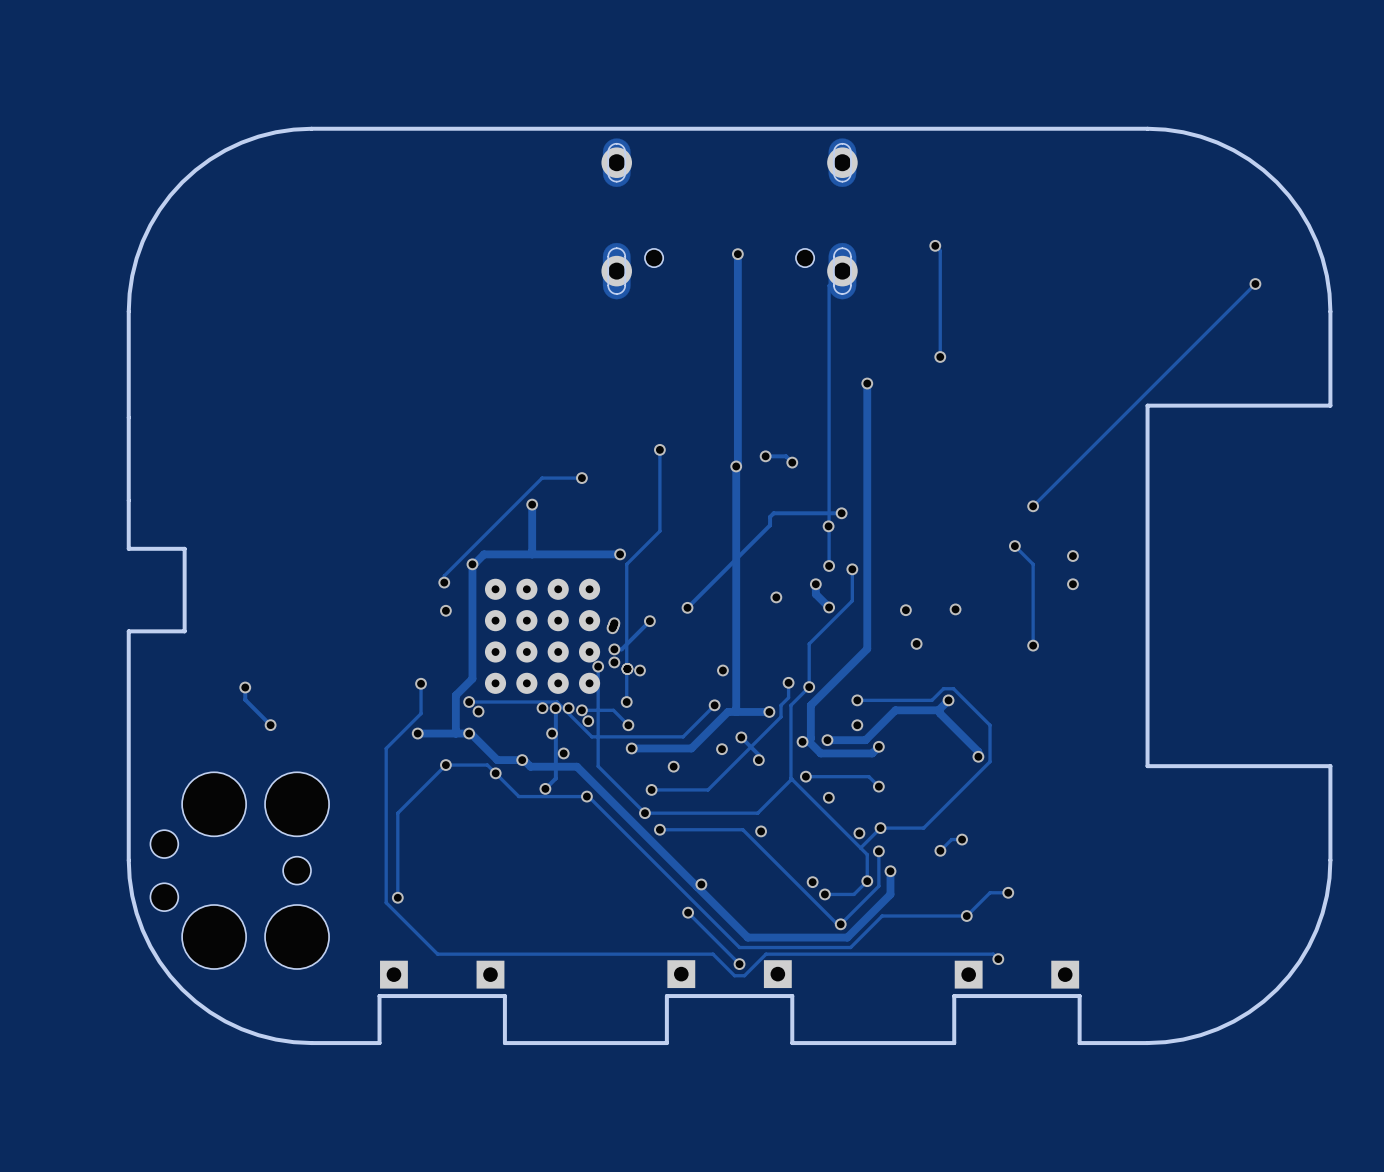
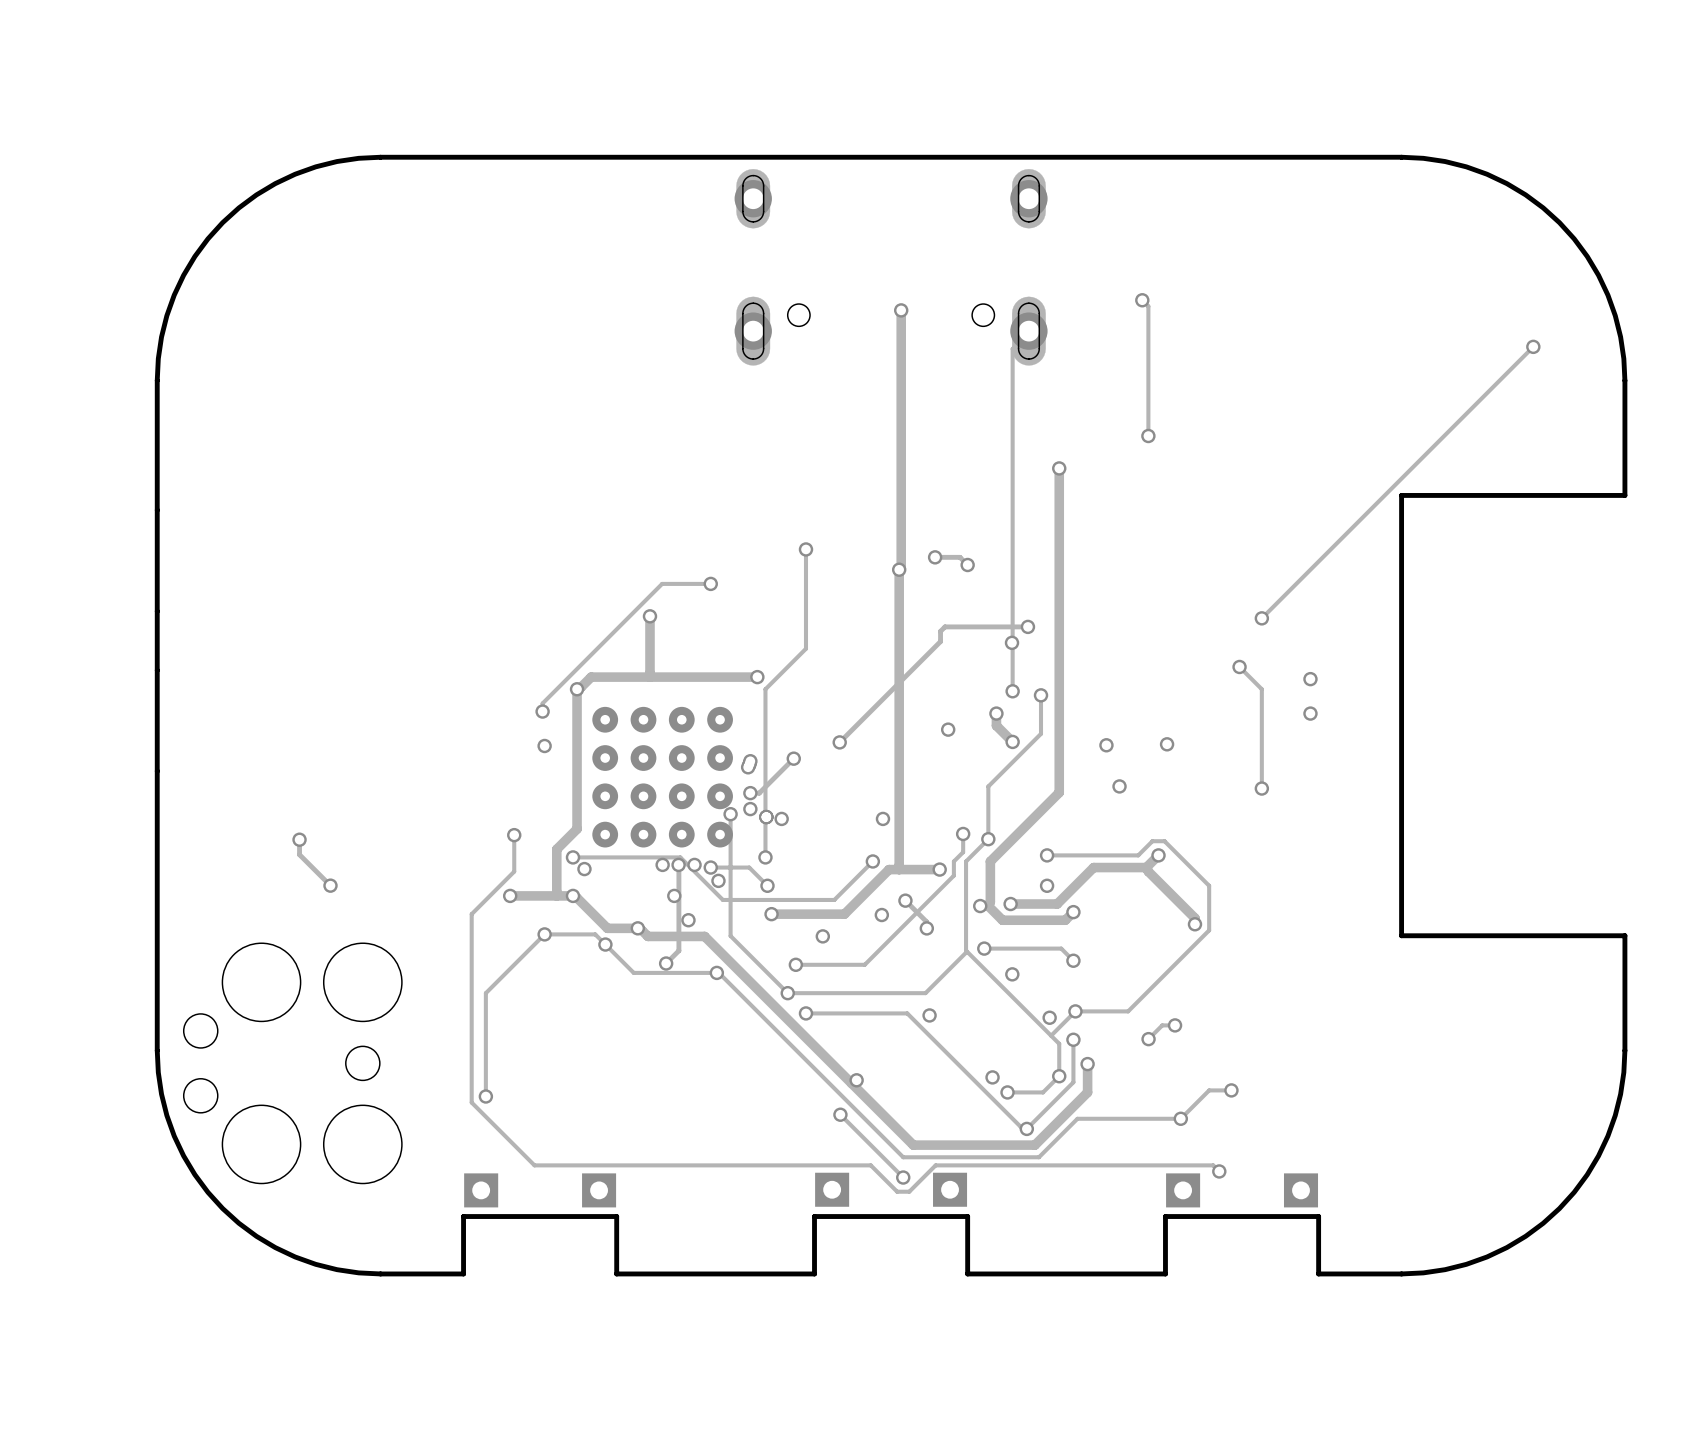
board edge: (128, 548) (184, 548) (184, 631) (128, 631) -> (157, 670) (157, 771)

